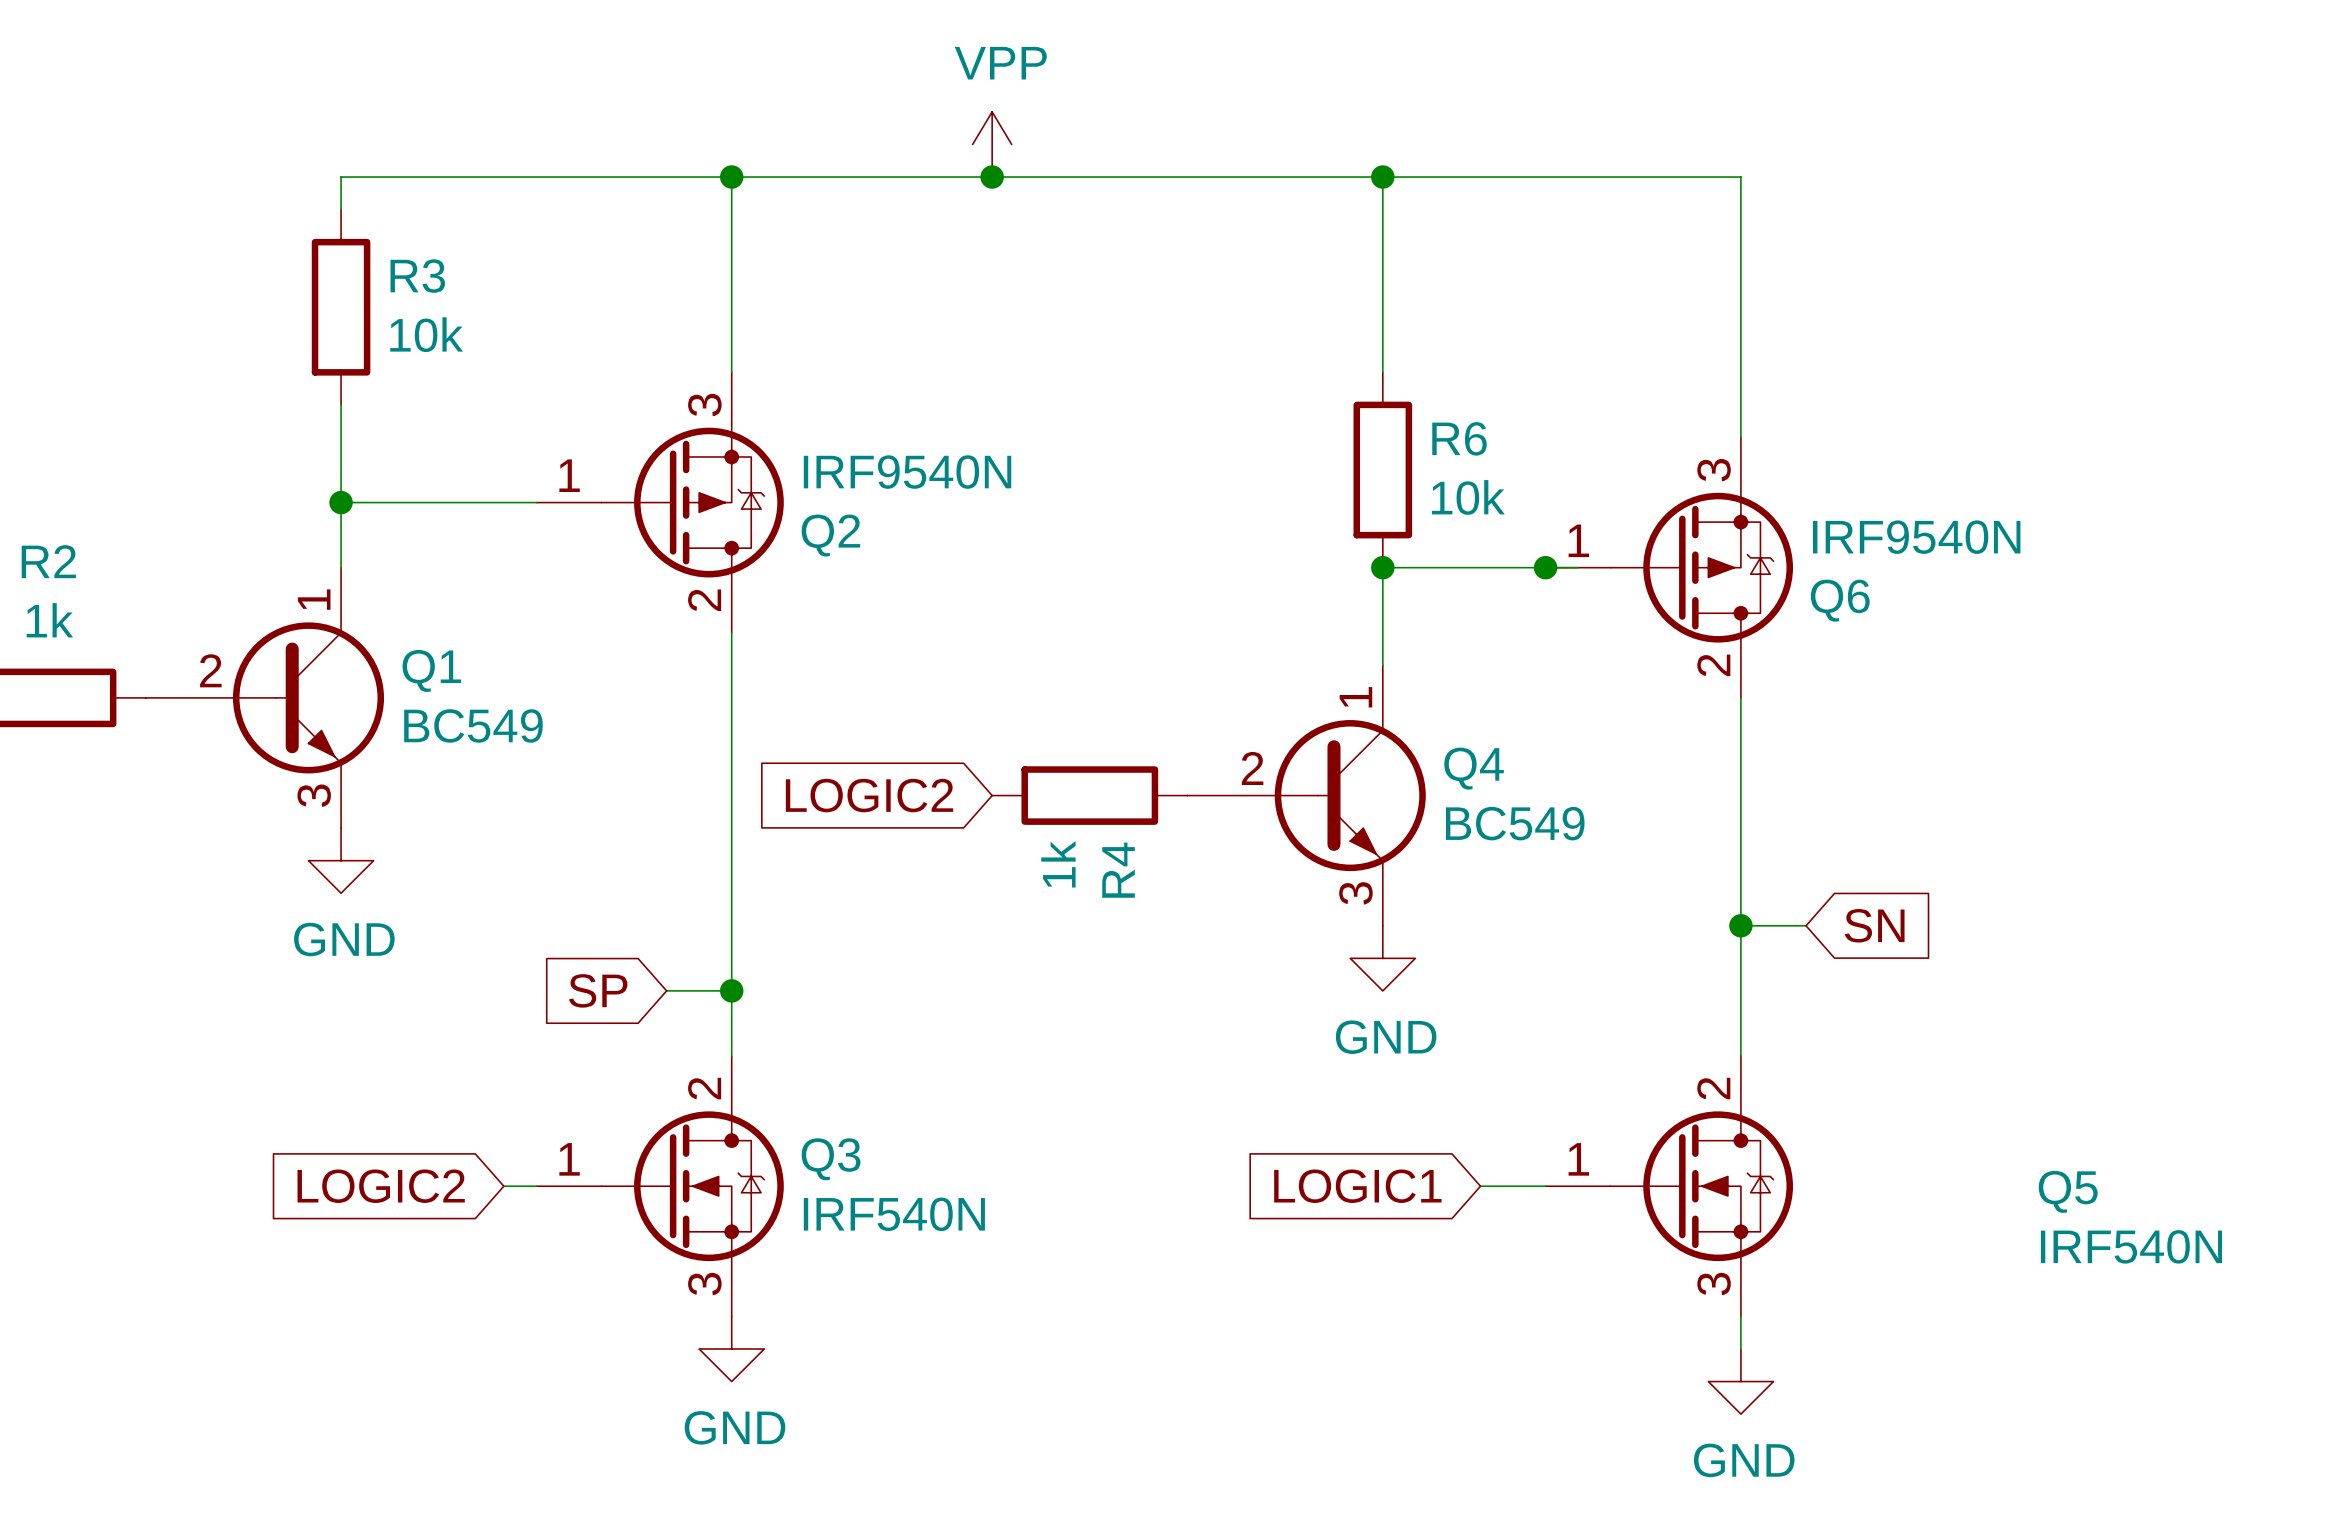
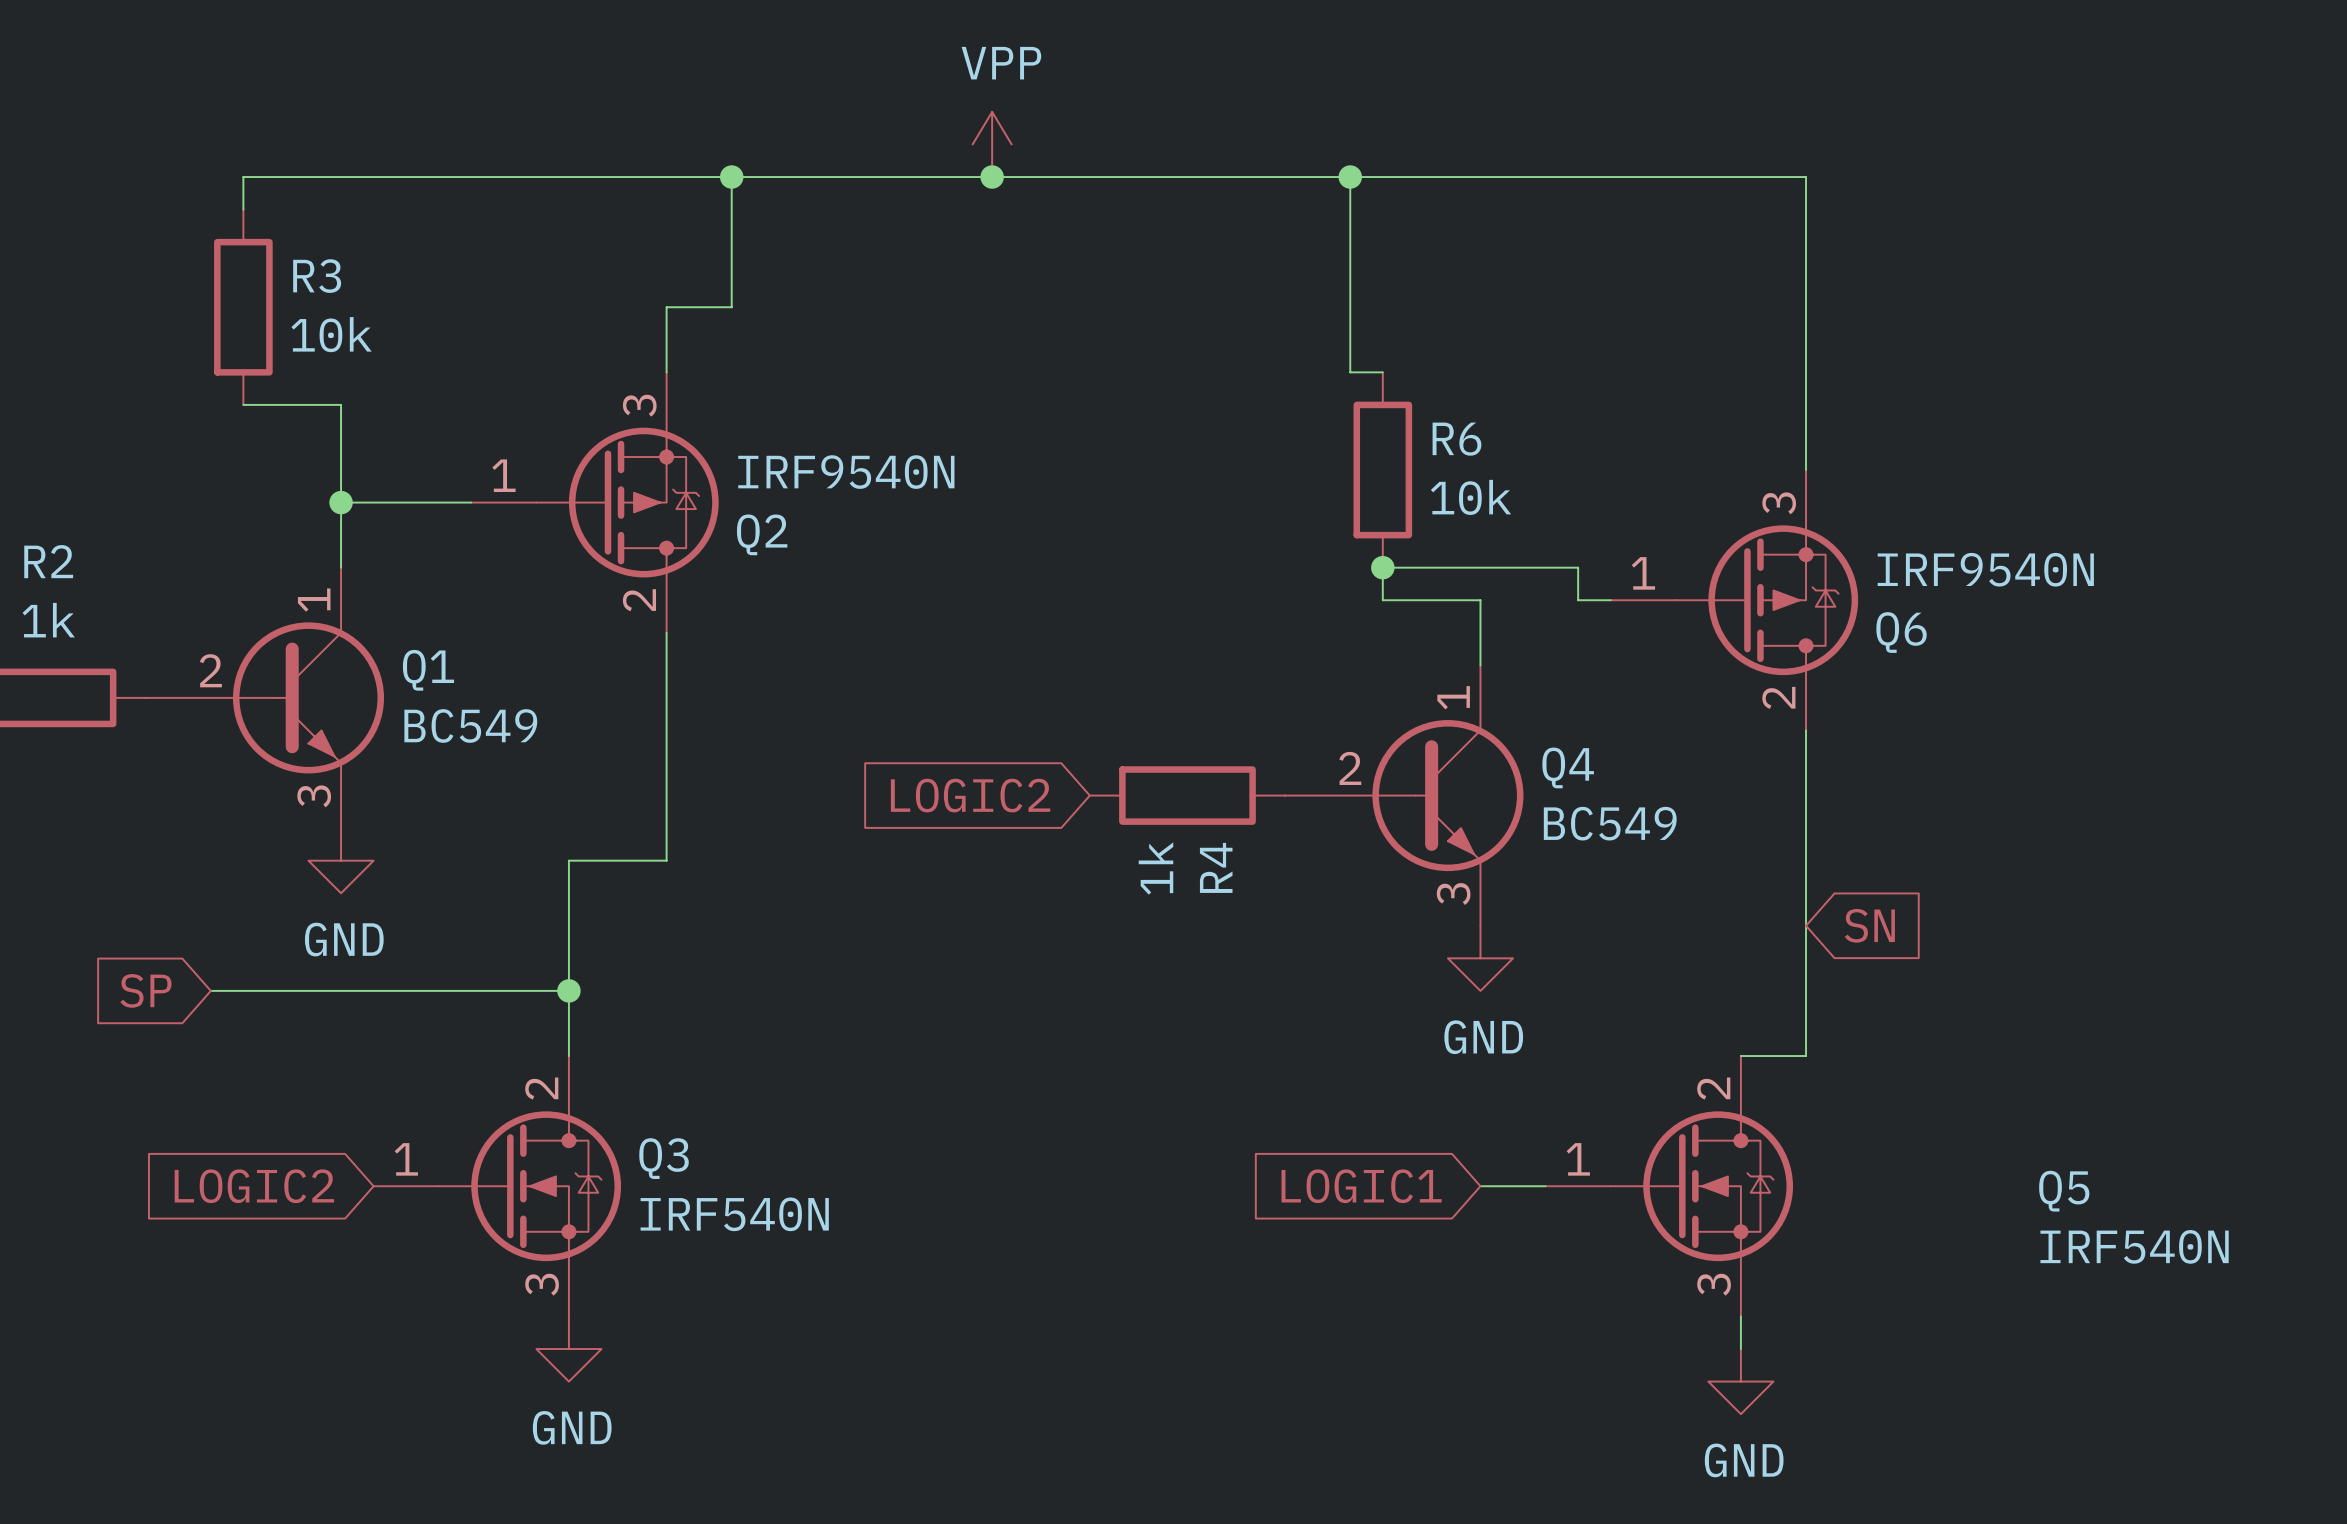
wire: (341, 177) (341, 209) -> (341, 177) (243, 177) (243, 209)
wire: (1382, 177) (1382, 372) -> (1350, 177) (1350, 372) (1382, 372)
junction position: (1382, 177) -> (1350, 177)
wire: (1740, 177) (1740, 437) -> (1740, 177) (1806, 177) (1806, 470)
R3 position: (341, 307) -> (243, 307)
wire: (731, 307) (731, 372) -> (731, 307) (666, 307) (666, 372)
wire: none -> (243, 404) (341, 404)
Q2 position: (660, 502) -> (594, 502)
junction: (1545, 567) -> none
wire: none -> (1578, 567) (1578, 600) (1610, 600)
Q6 position: (1669, 567) -> (1734, 600)
wire: (1382, 600) (1382, 665) -> (1382, 600) (1480, 600) (1480, 665)
wire: none -> (666, 632) (666, 860) (568, 860) (568, 1056)
wire: (731, 632) (731, 1056) -> none
wire: (1740, 697) (1740, 1056) -> (1806, 730) (1806, 1056) (1740, 1056)
global label position: LOGIC2 (869, 795) -> LOGIC2 (970, 795)
R4 position: (1089, 795) -> (1187, 795)
Q4 position: (1306, 795) -> (1404, 795)
wire: (1740, 925) (1806, 925) -> none
junction: (1740, 925) -> none
power symbol position: GND (1382, 958) -> GND (1480, 958)
wire: none -> (210, 990) (568, 990)
junction: none -> (568, 990)
global label position: SP (598, 990) -> SP (145, 990)
wire: (666, 990) (731, 990) -> none
junction: (731, 990) -> none
global label position: LOGIC2 (381, 1186) -> LOGIC2 (254, 1186)
Q3 position: (660, 1186) -> (497, 1186)
power symbol position: GND (731, 1349) -> GND (568, 1349)

